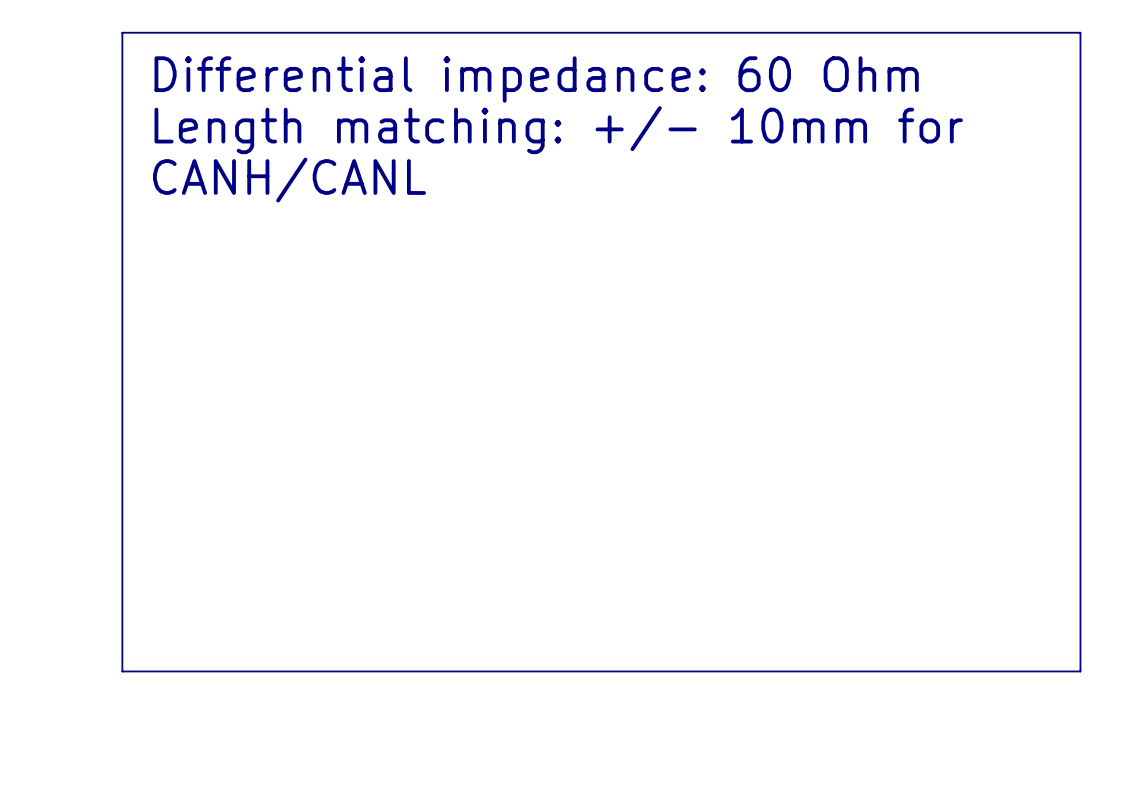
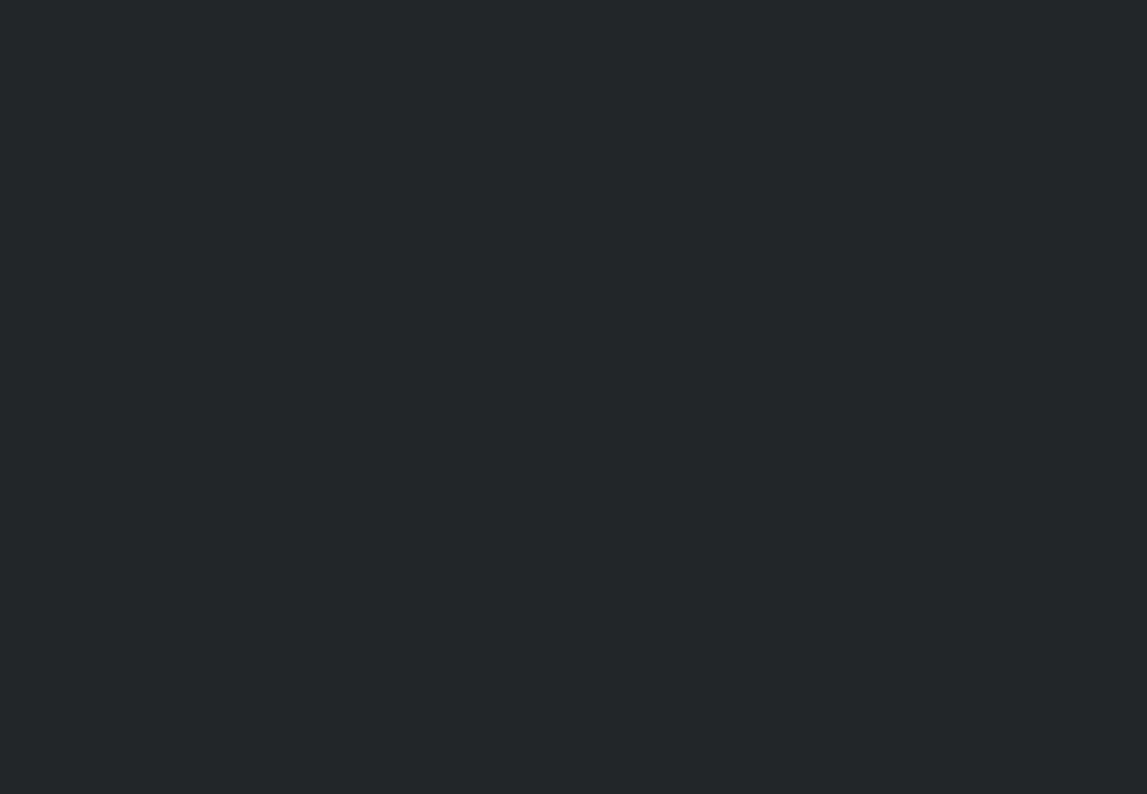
line: (122, 32) (1080, 32) (1080, 671) (122, 671) (122, 32) -> none
text: Differential impedance: 60 Ohm (536, 79) -> none
text: Length matching: +/- 10mm for (558, 130) -> none
text: CANH/CANL (289, 180) -> none

